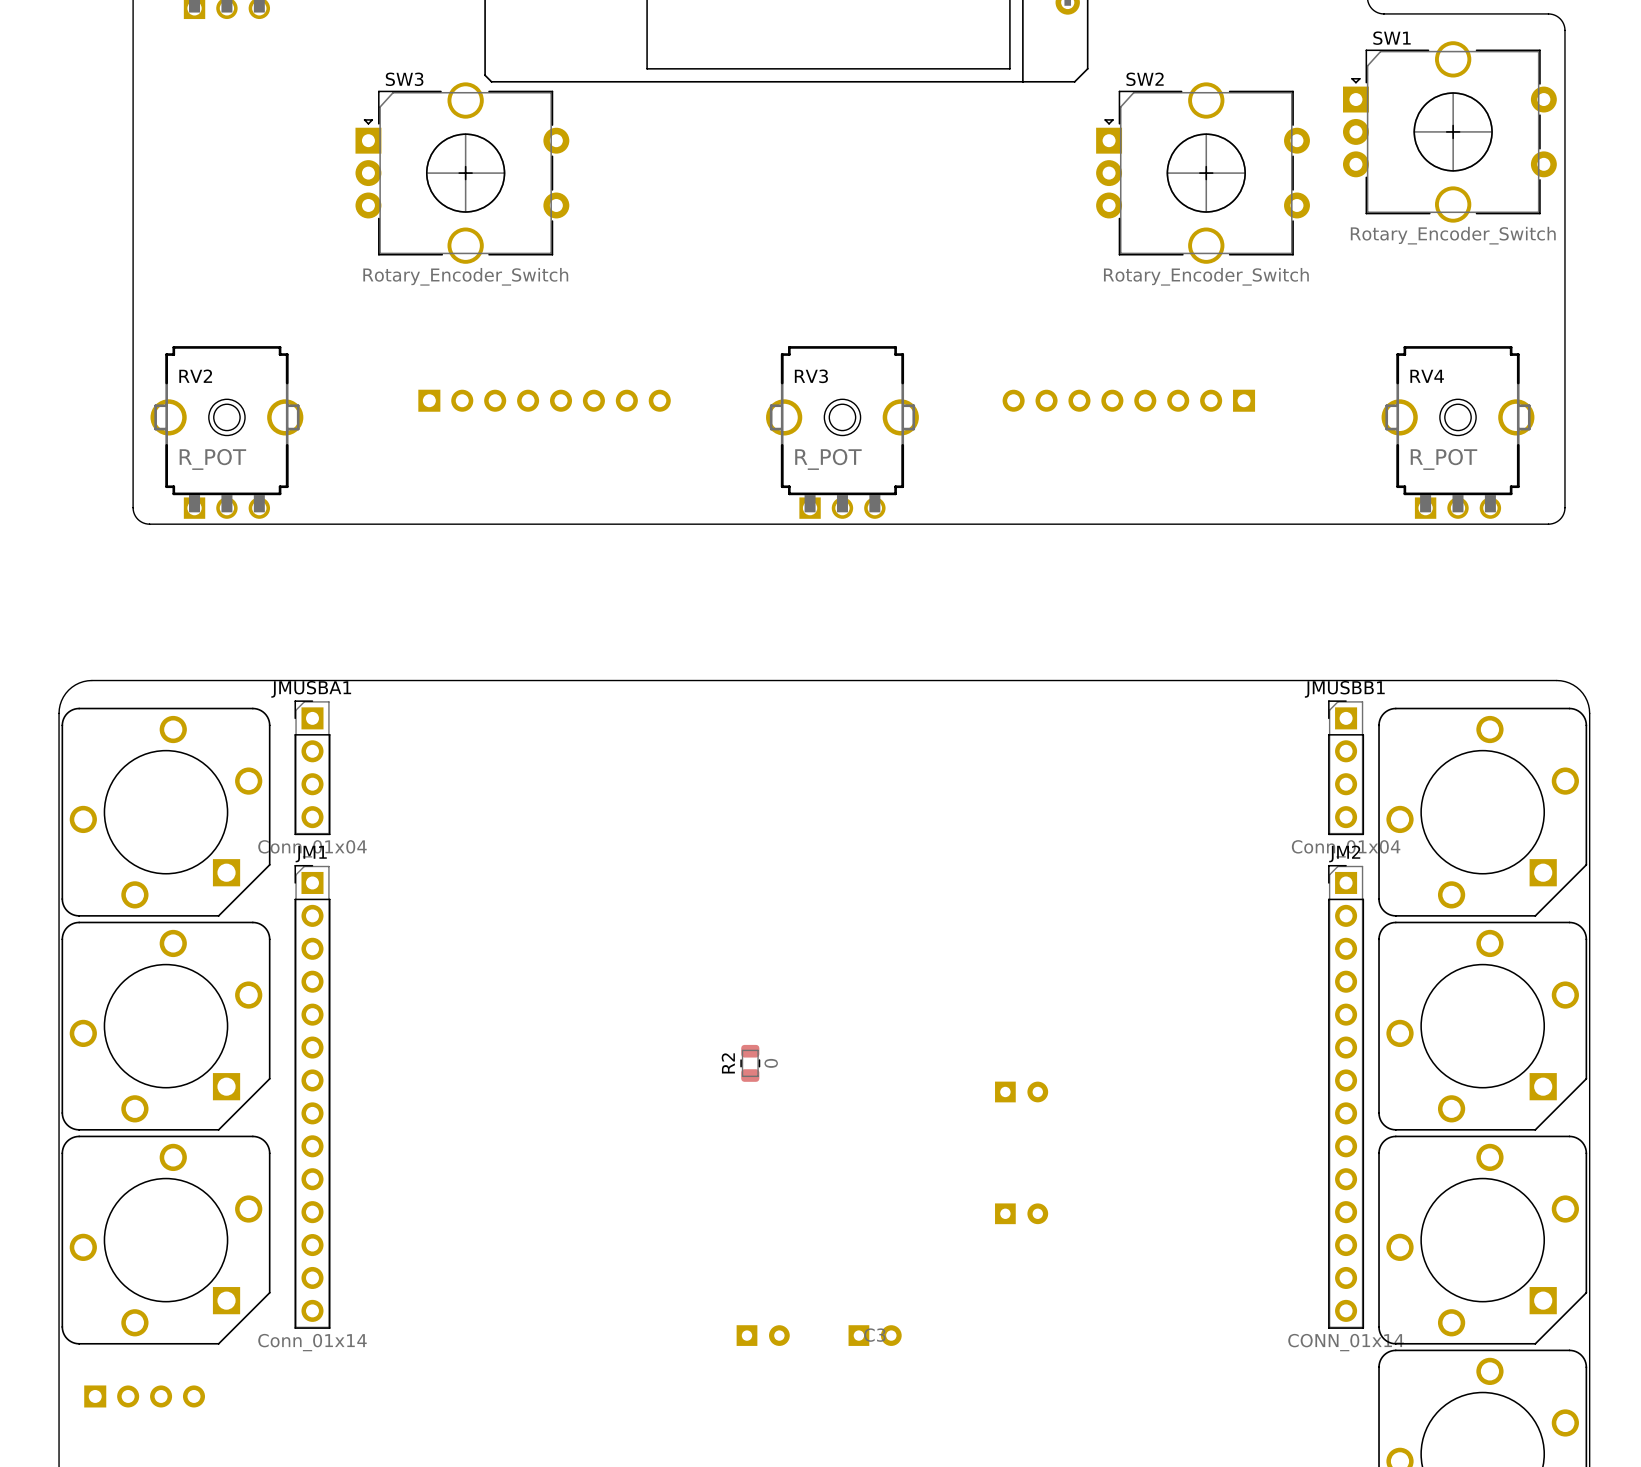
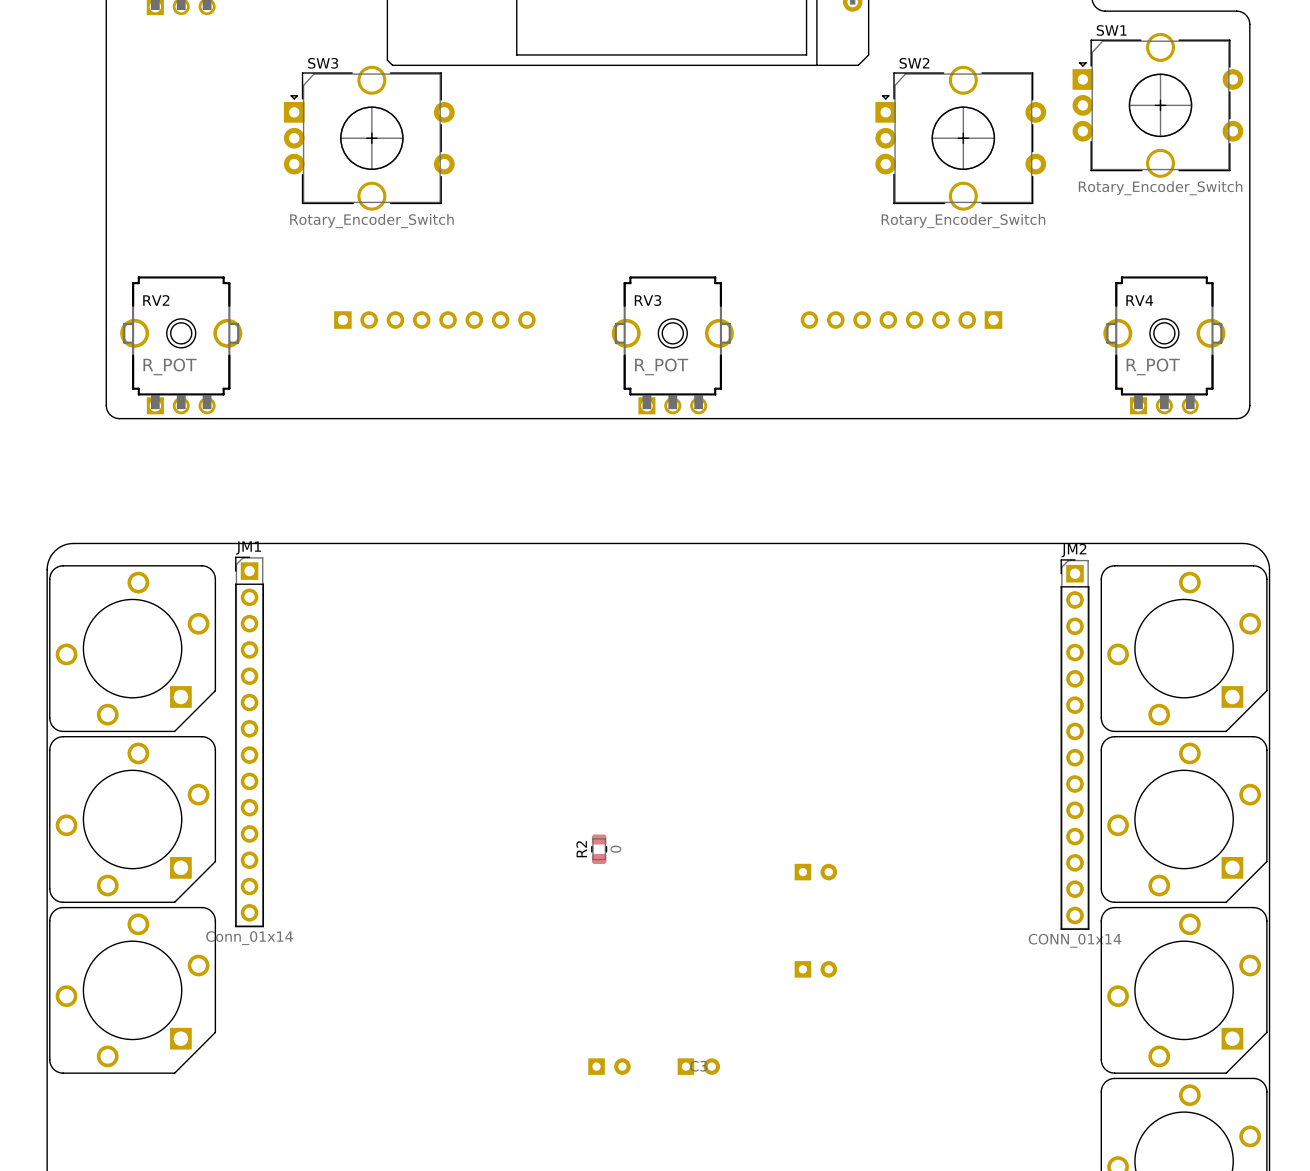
JMUSBA1: Conn_01x04 (312, 767) -> none
JMUSBB1: Conn_01x04 (1346, 767) -> none
JM1 position: (312, 1096) -> (249, 741)
JM2 position: (1346, 1096) -> (1075, 744)
part: (144, 1396) -> none

